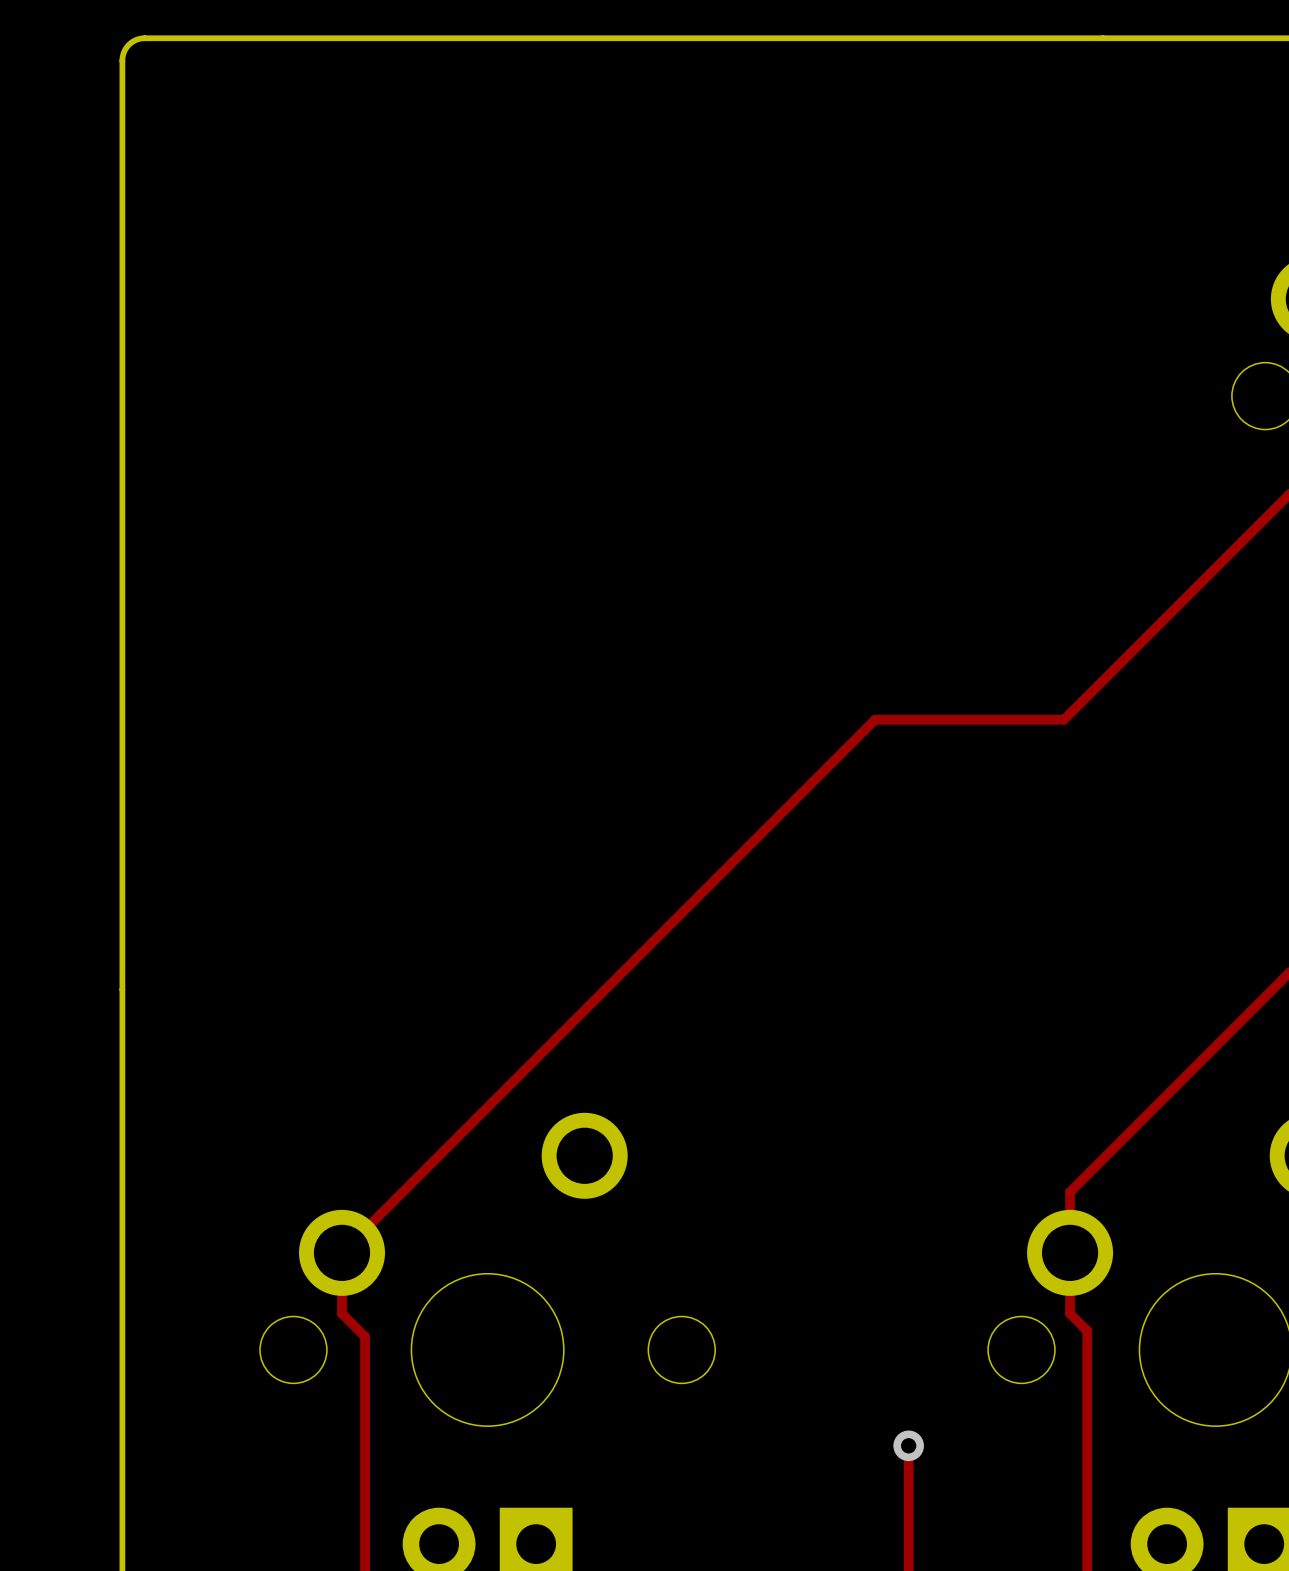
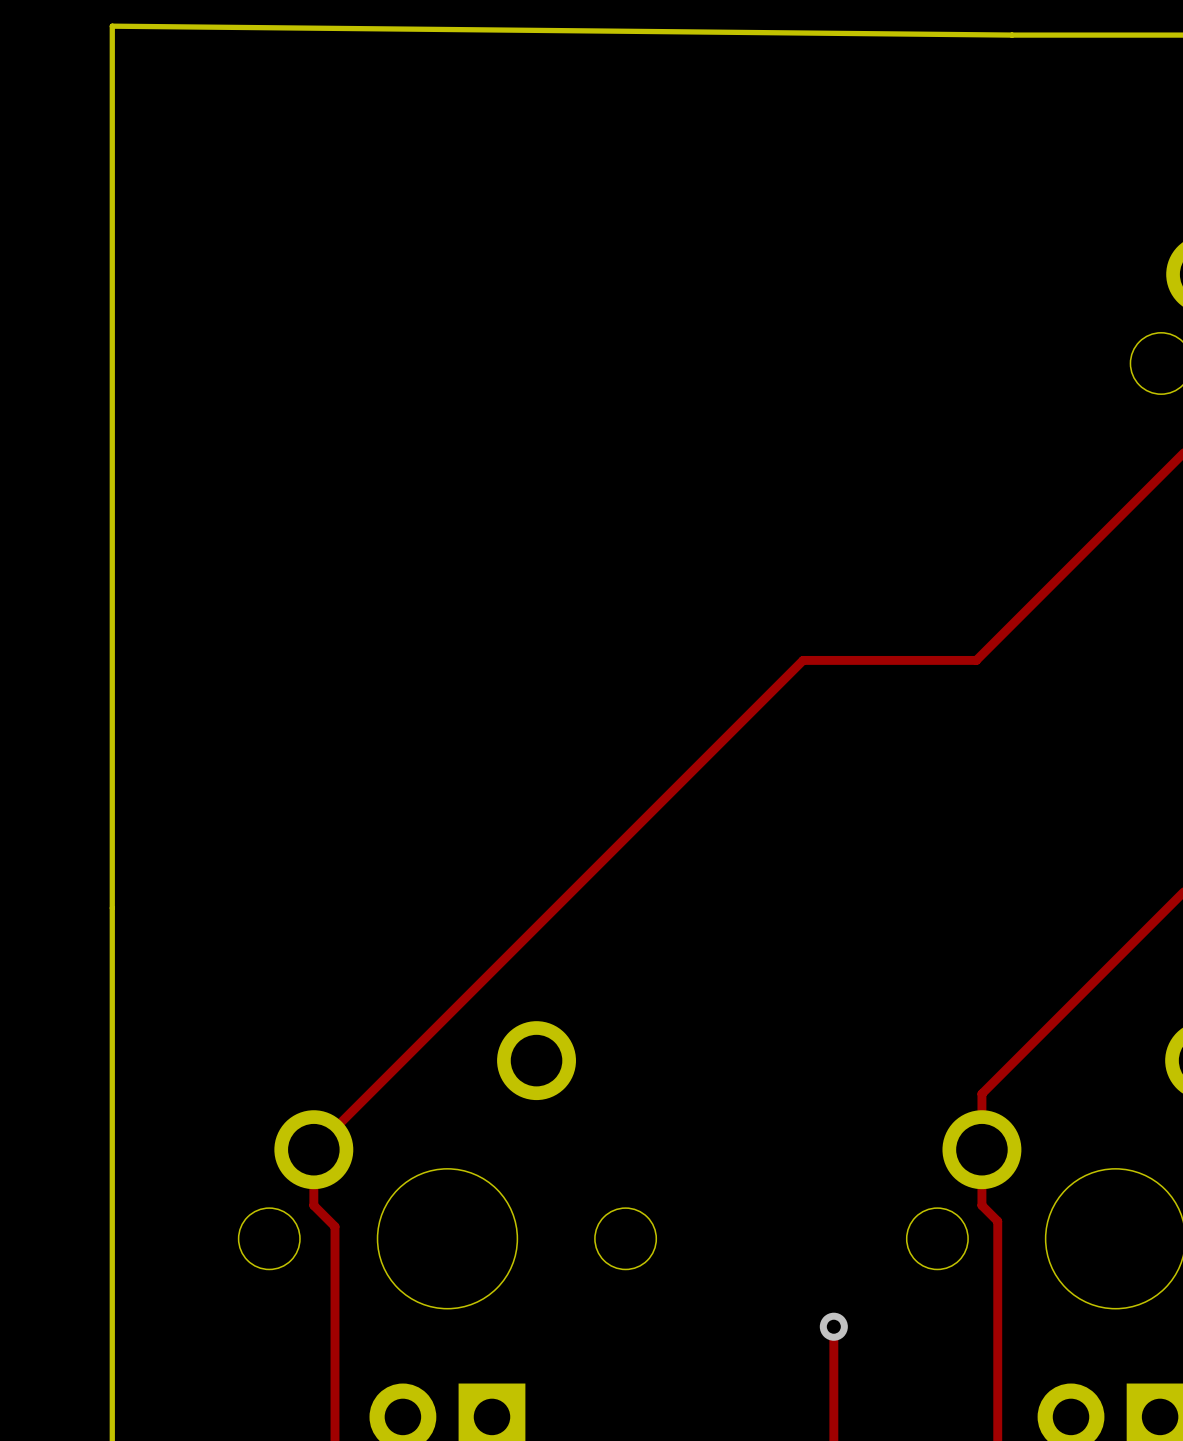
board edge: (1102, 38) (144, 38) (136, 39) (128, 44) (124, 52) (122, 60) -> (1011, 35) (112, 26) (112, 55)

